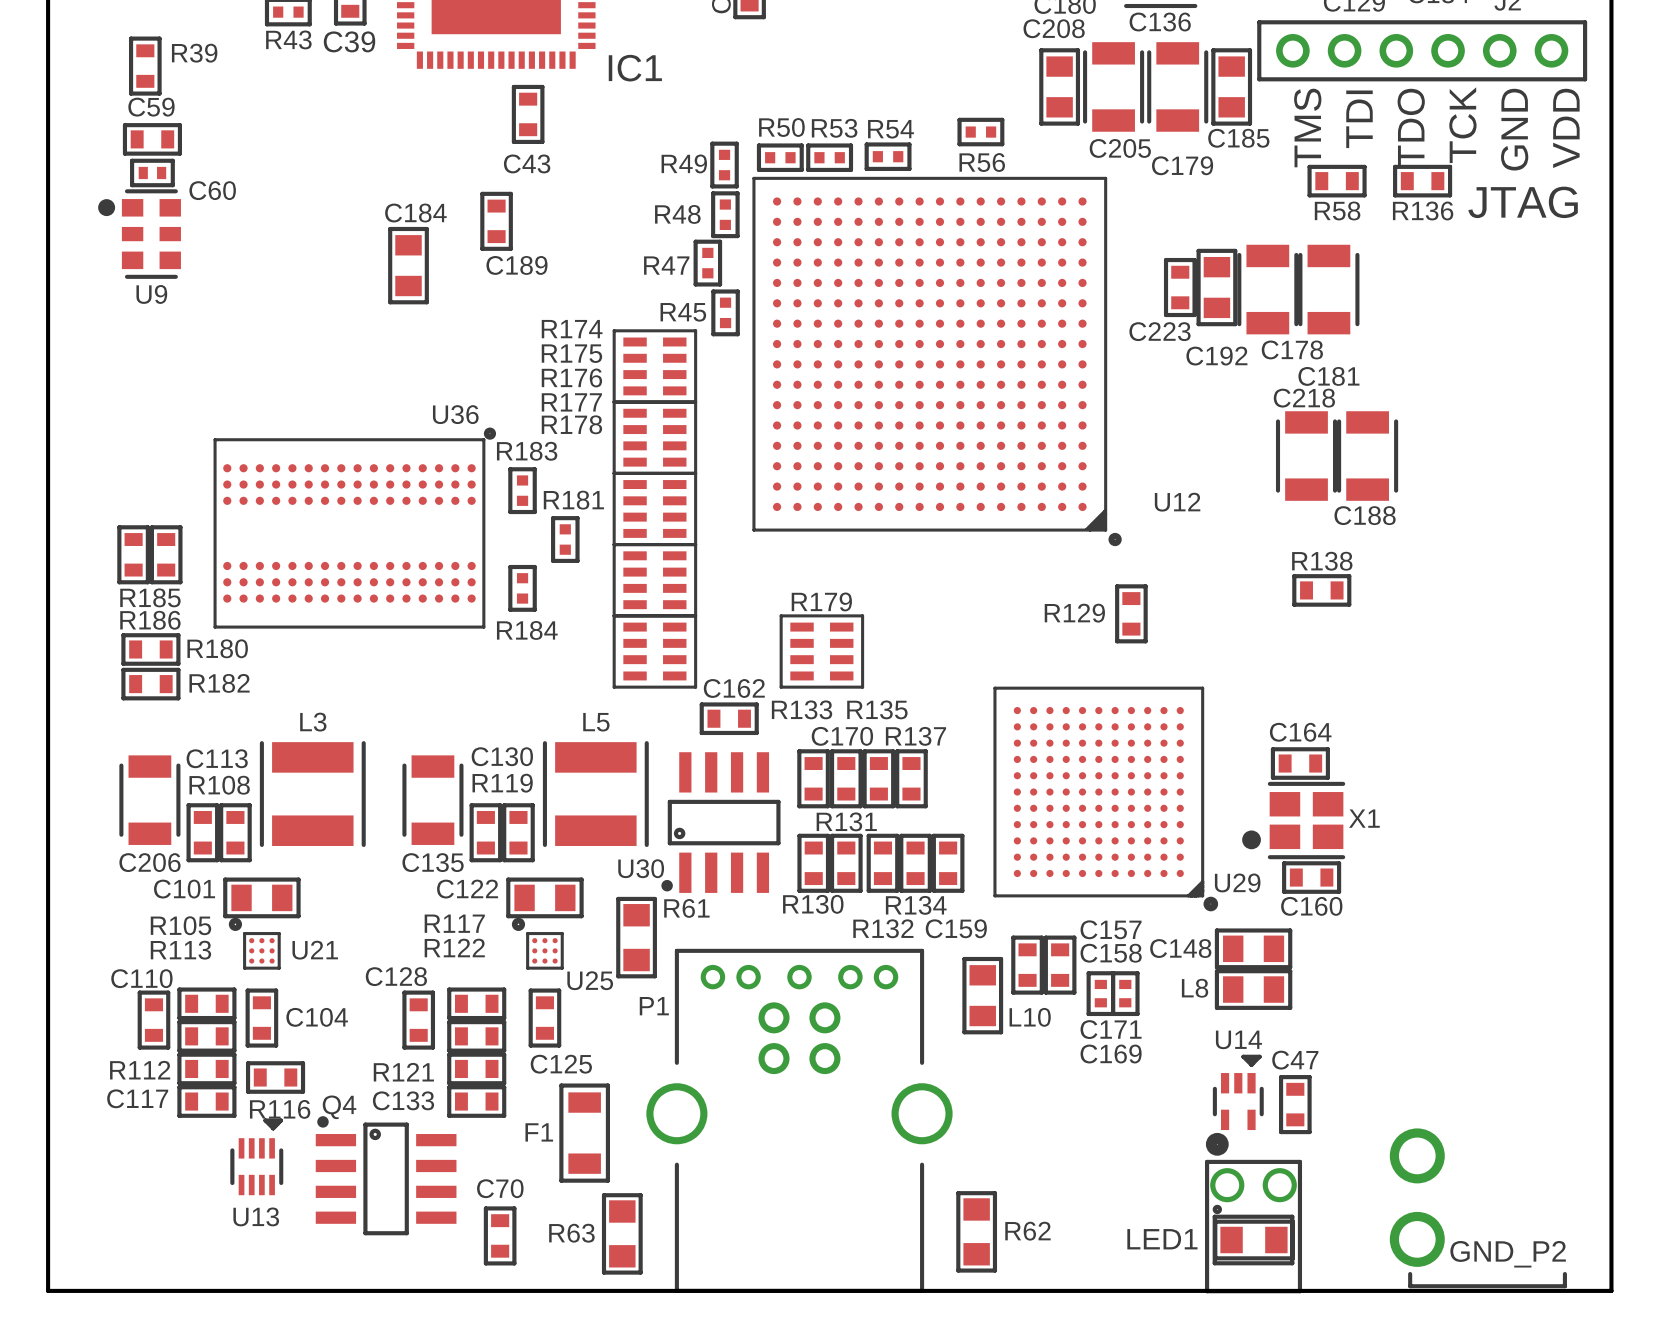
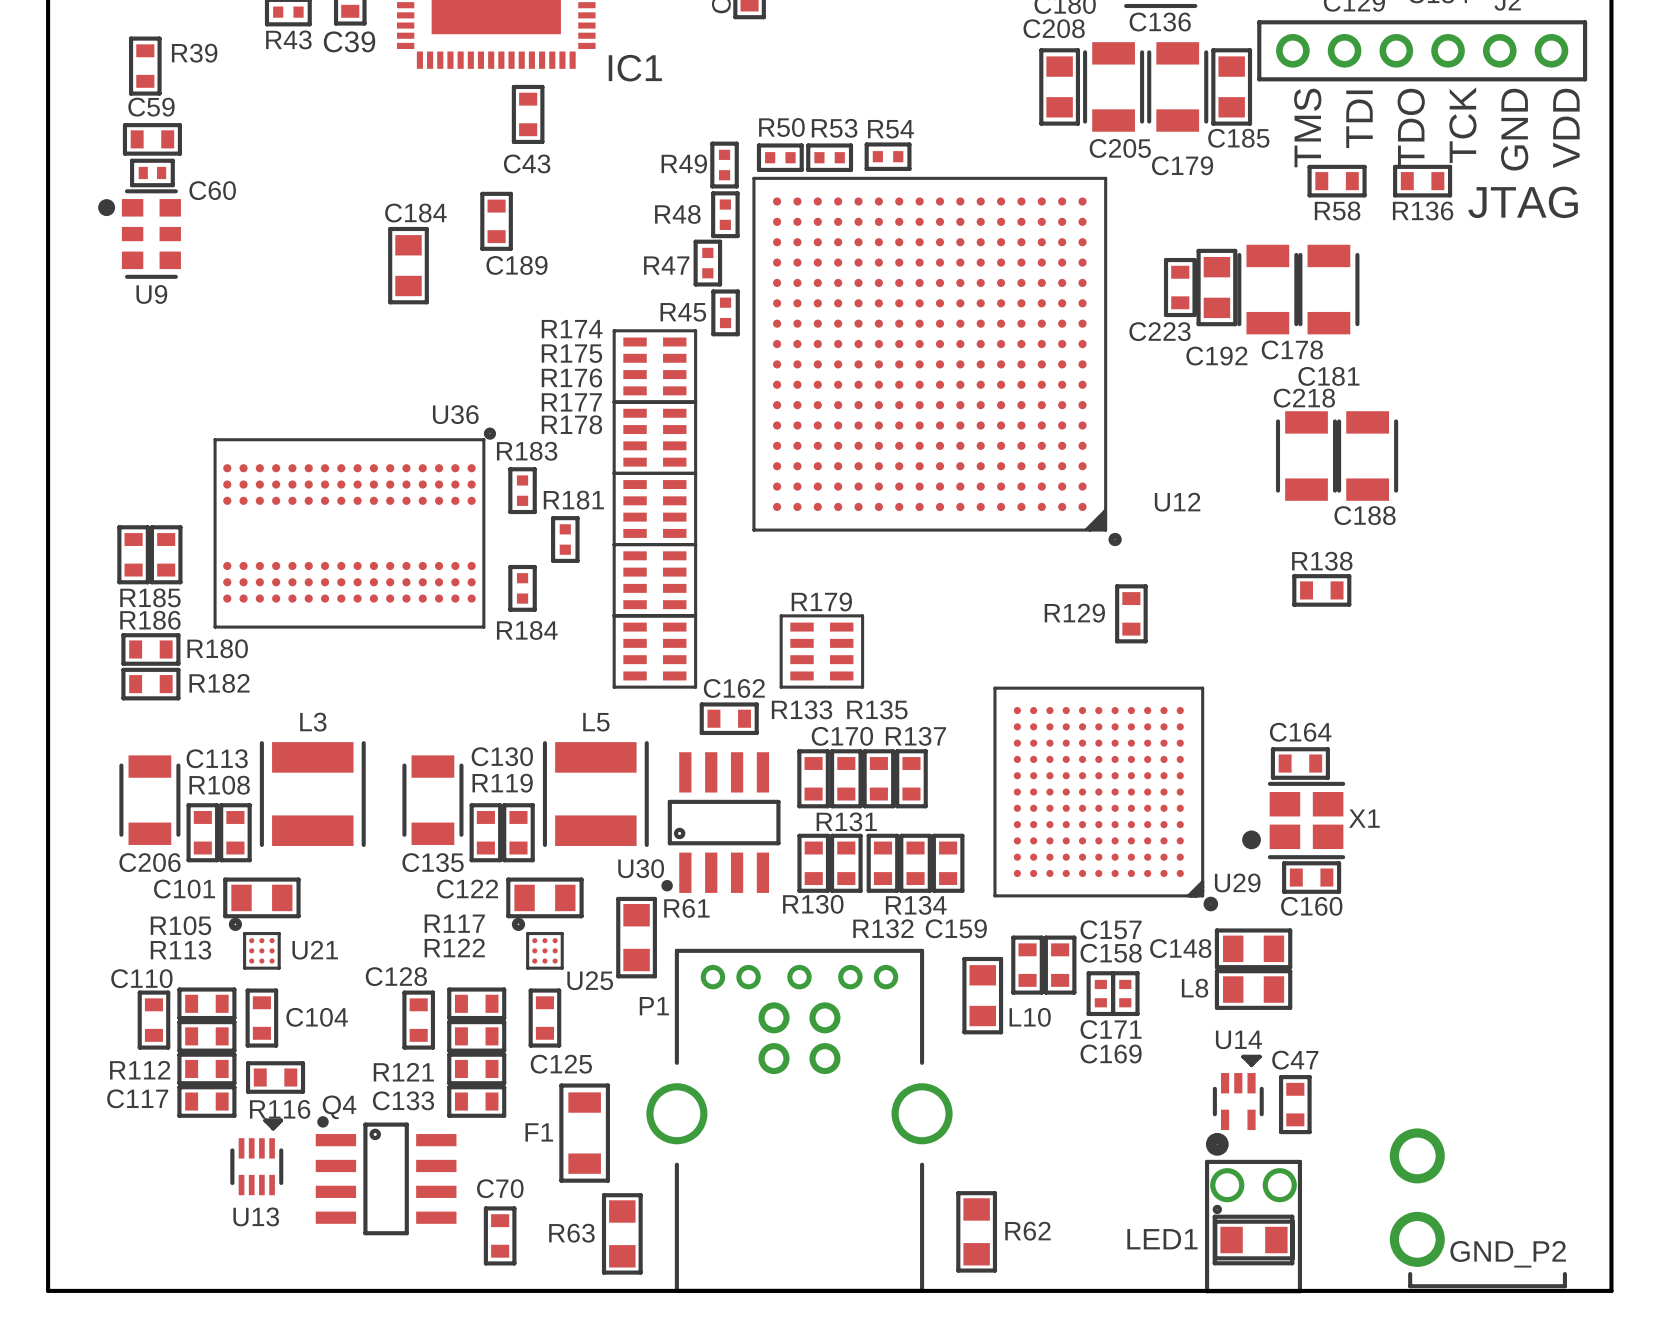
R56: (980, 132) -> none

